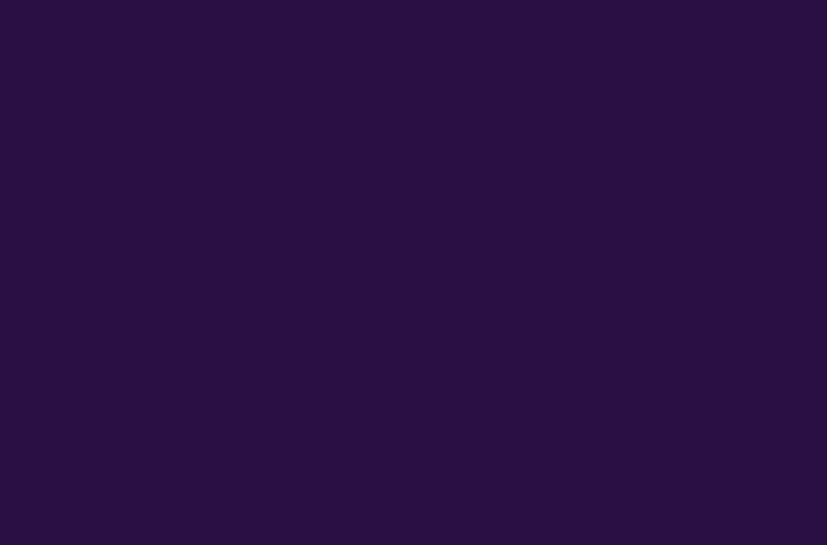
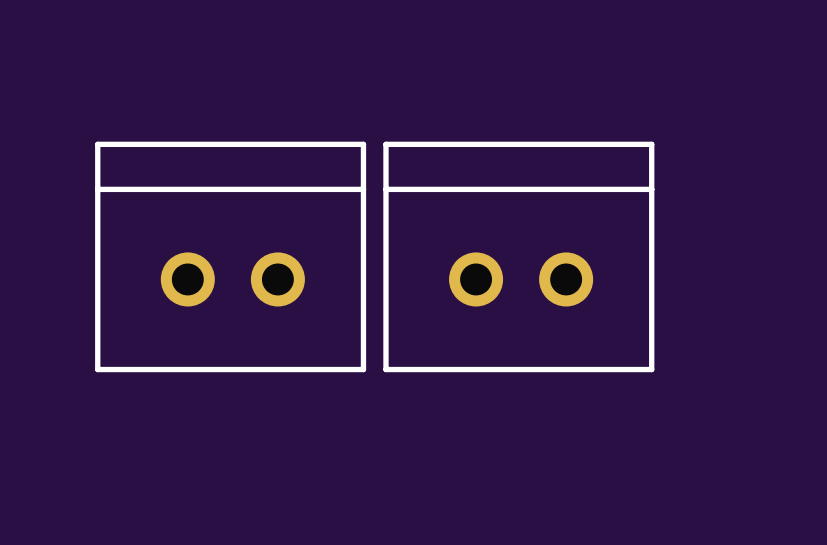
part: none -> (230, 256)
part: none -> (518, 256)

